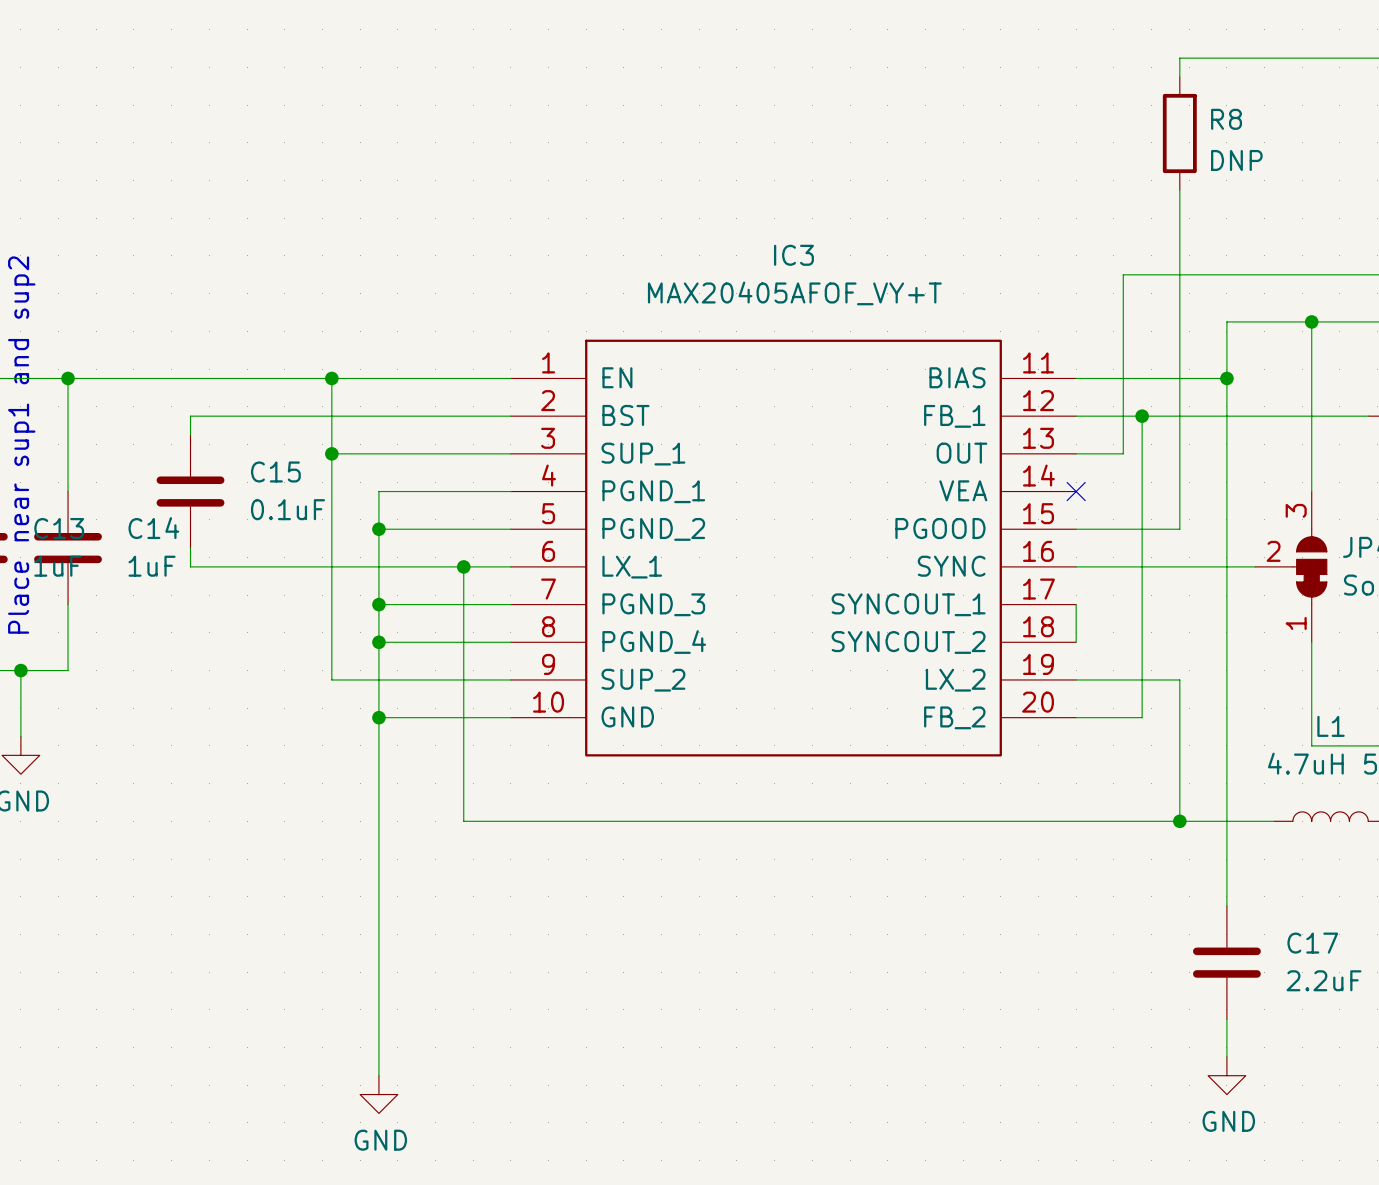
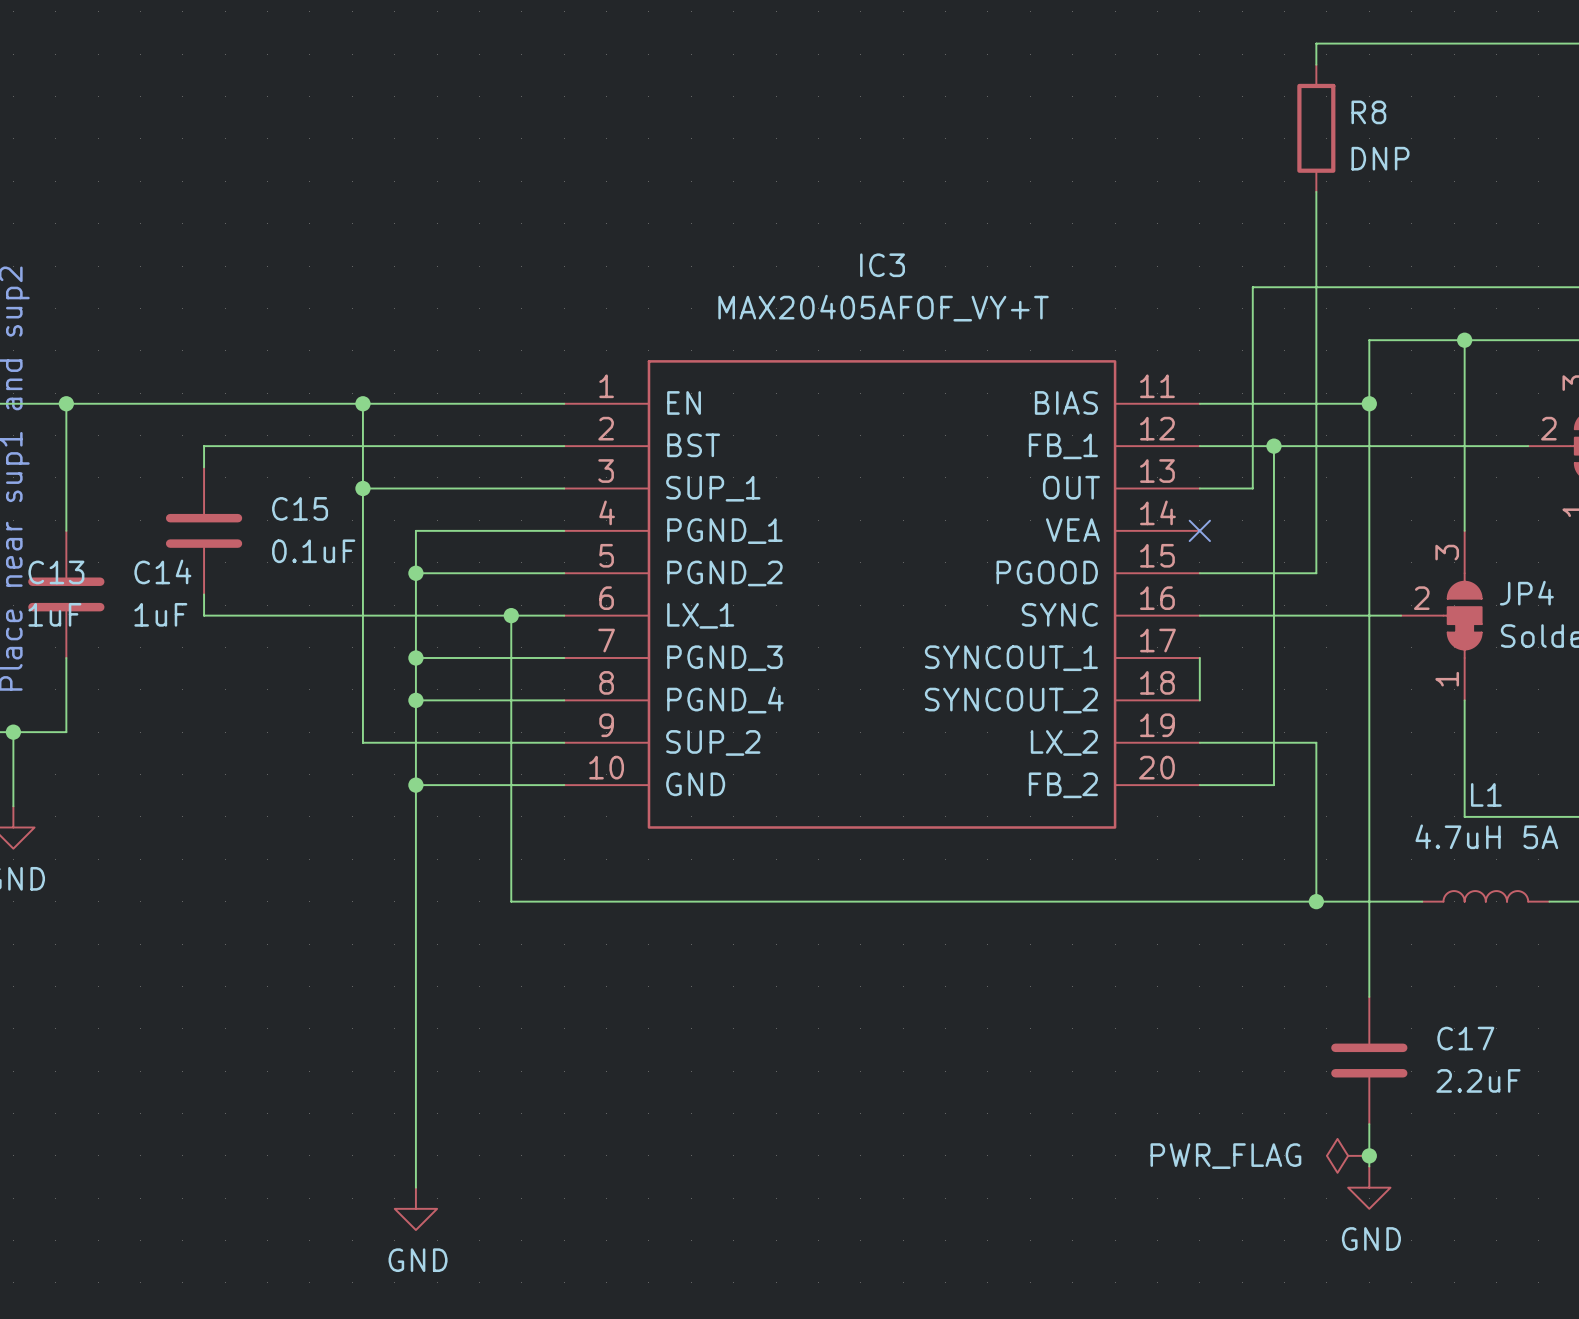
power symbol: none -> PWR_FLAG (1348, 1155)
junction: none -> (1369, 1155)

